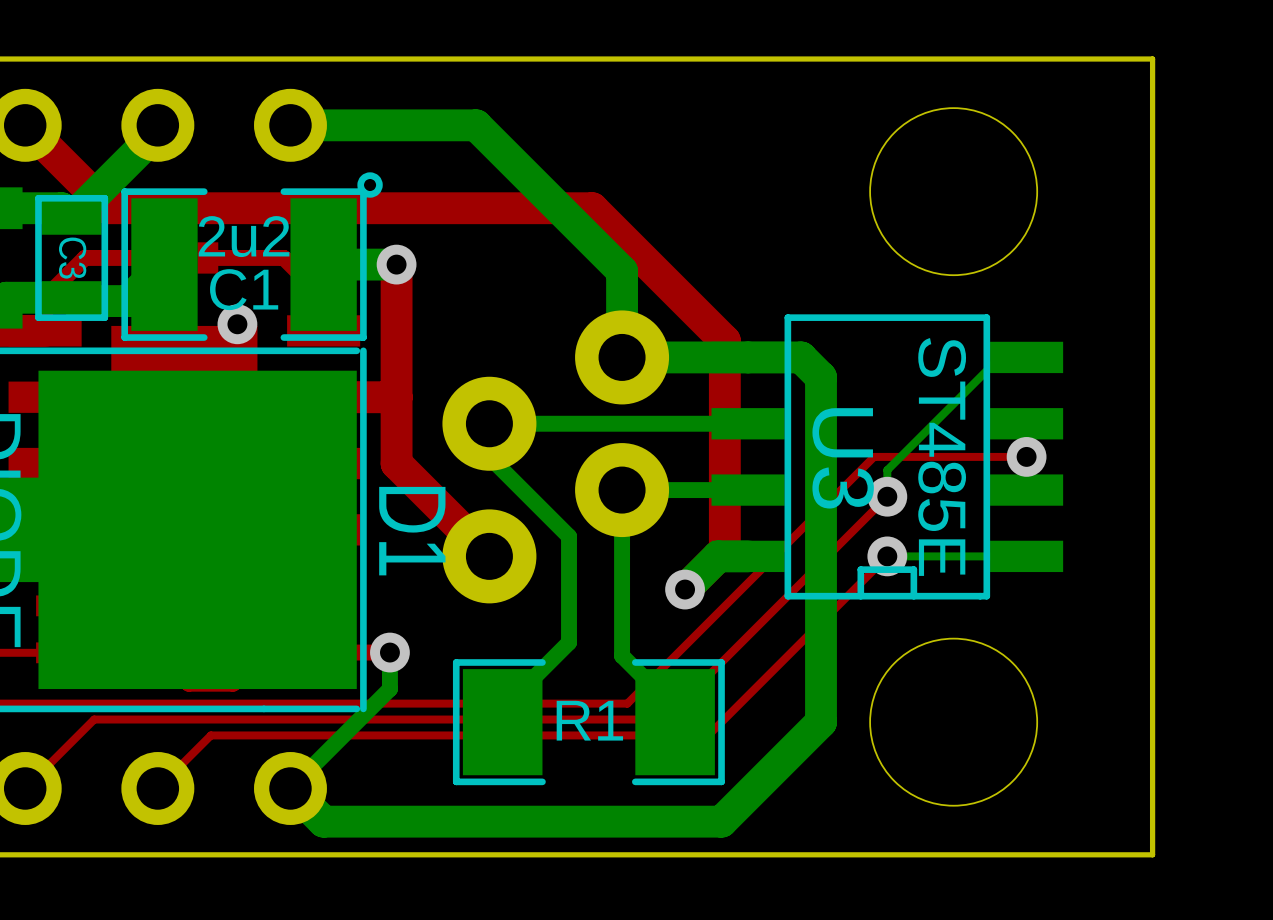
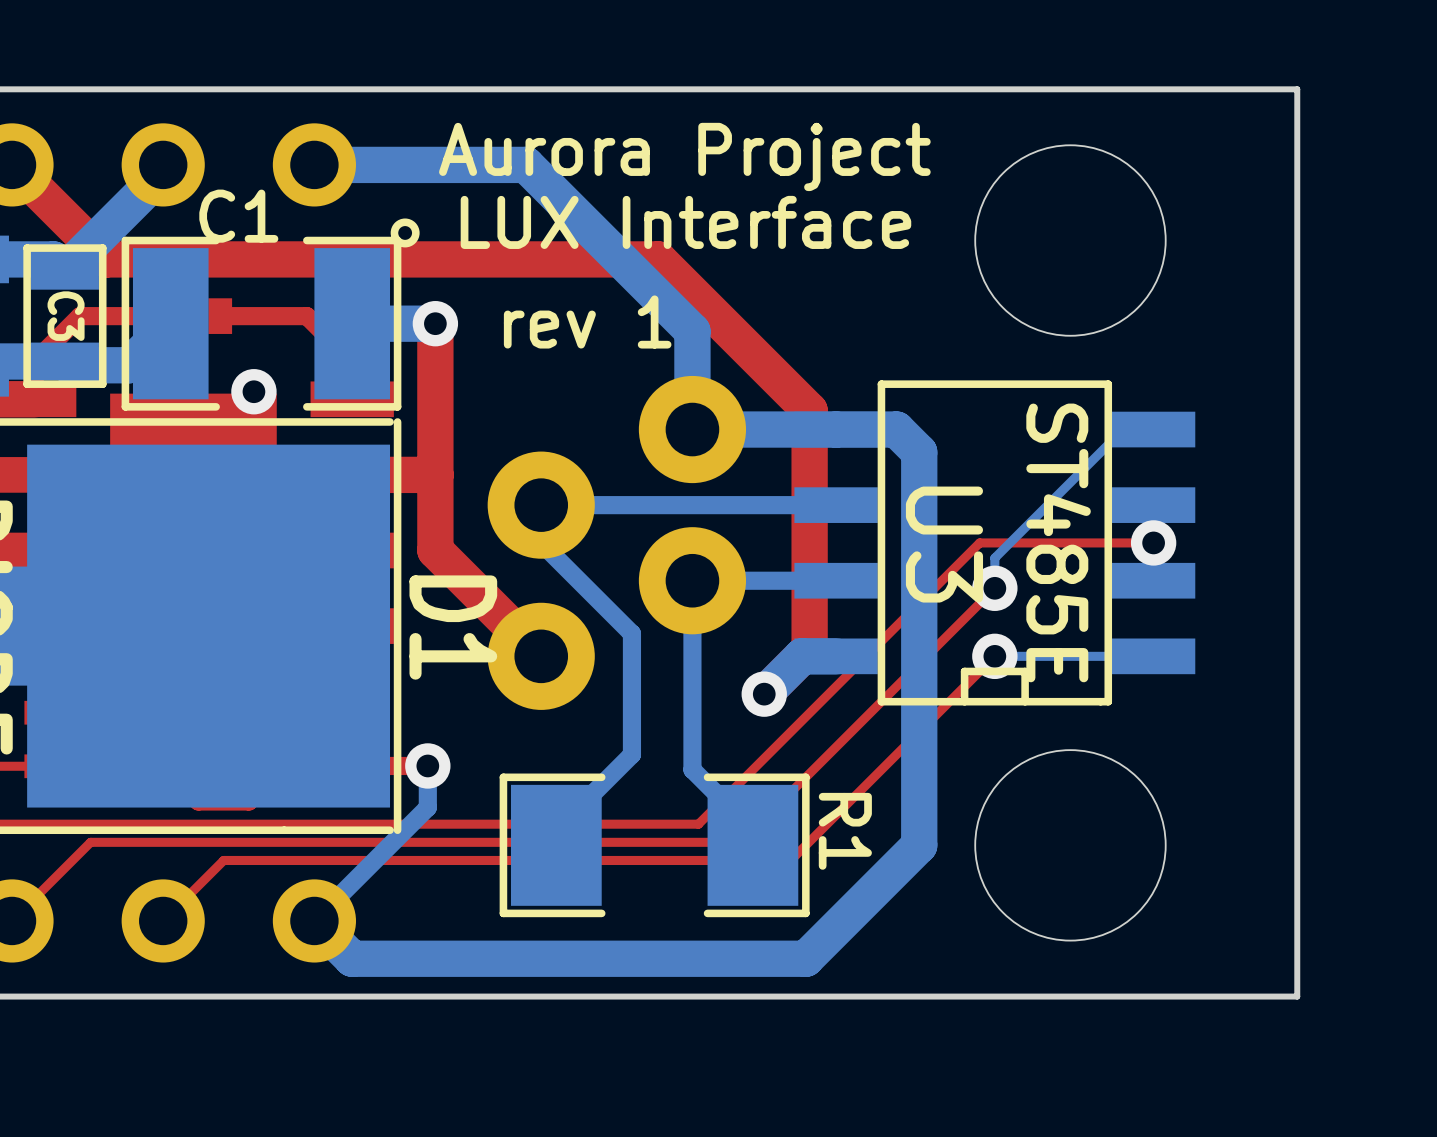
text: none -> Aurora Project (684, 156)
text: none -> LUX Interface (685, 222)
C1 value: 2u2 (244, 236) -> none
text: none -> rev 1 (587, 321)
C1 name position: C1 (244, 289) -> C1 (238, 216)
R1 name rotation: 0° (589, 720) -> 90° clockwise (845, 831)
R1 name position: R1 (589, 720) -> R1 (845, 831)

